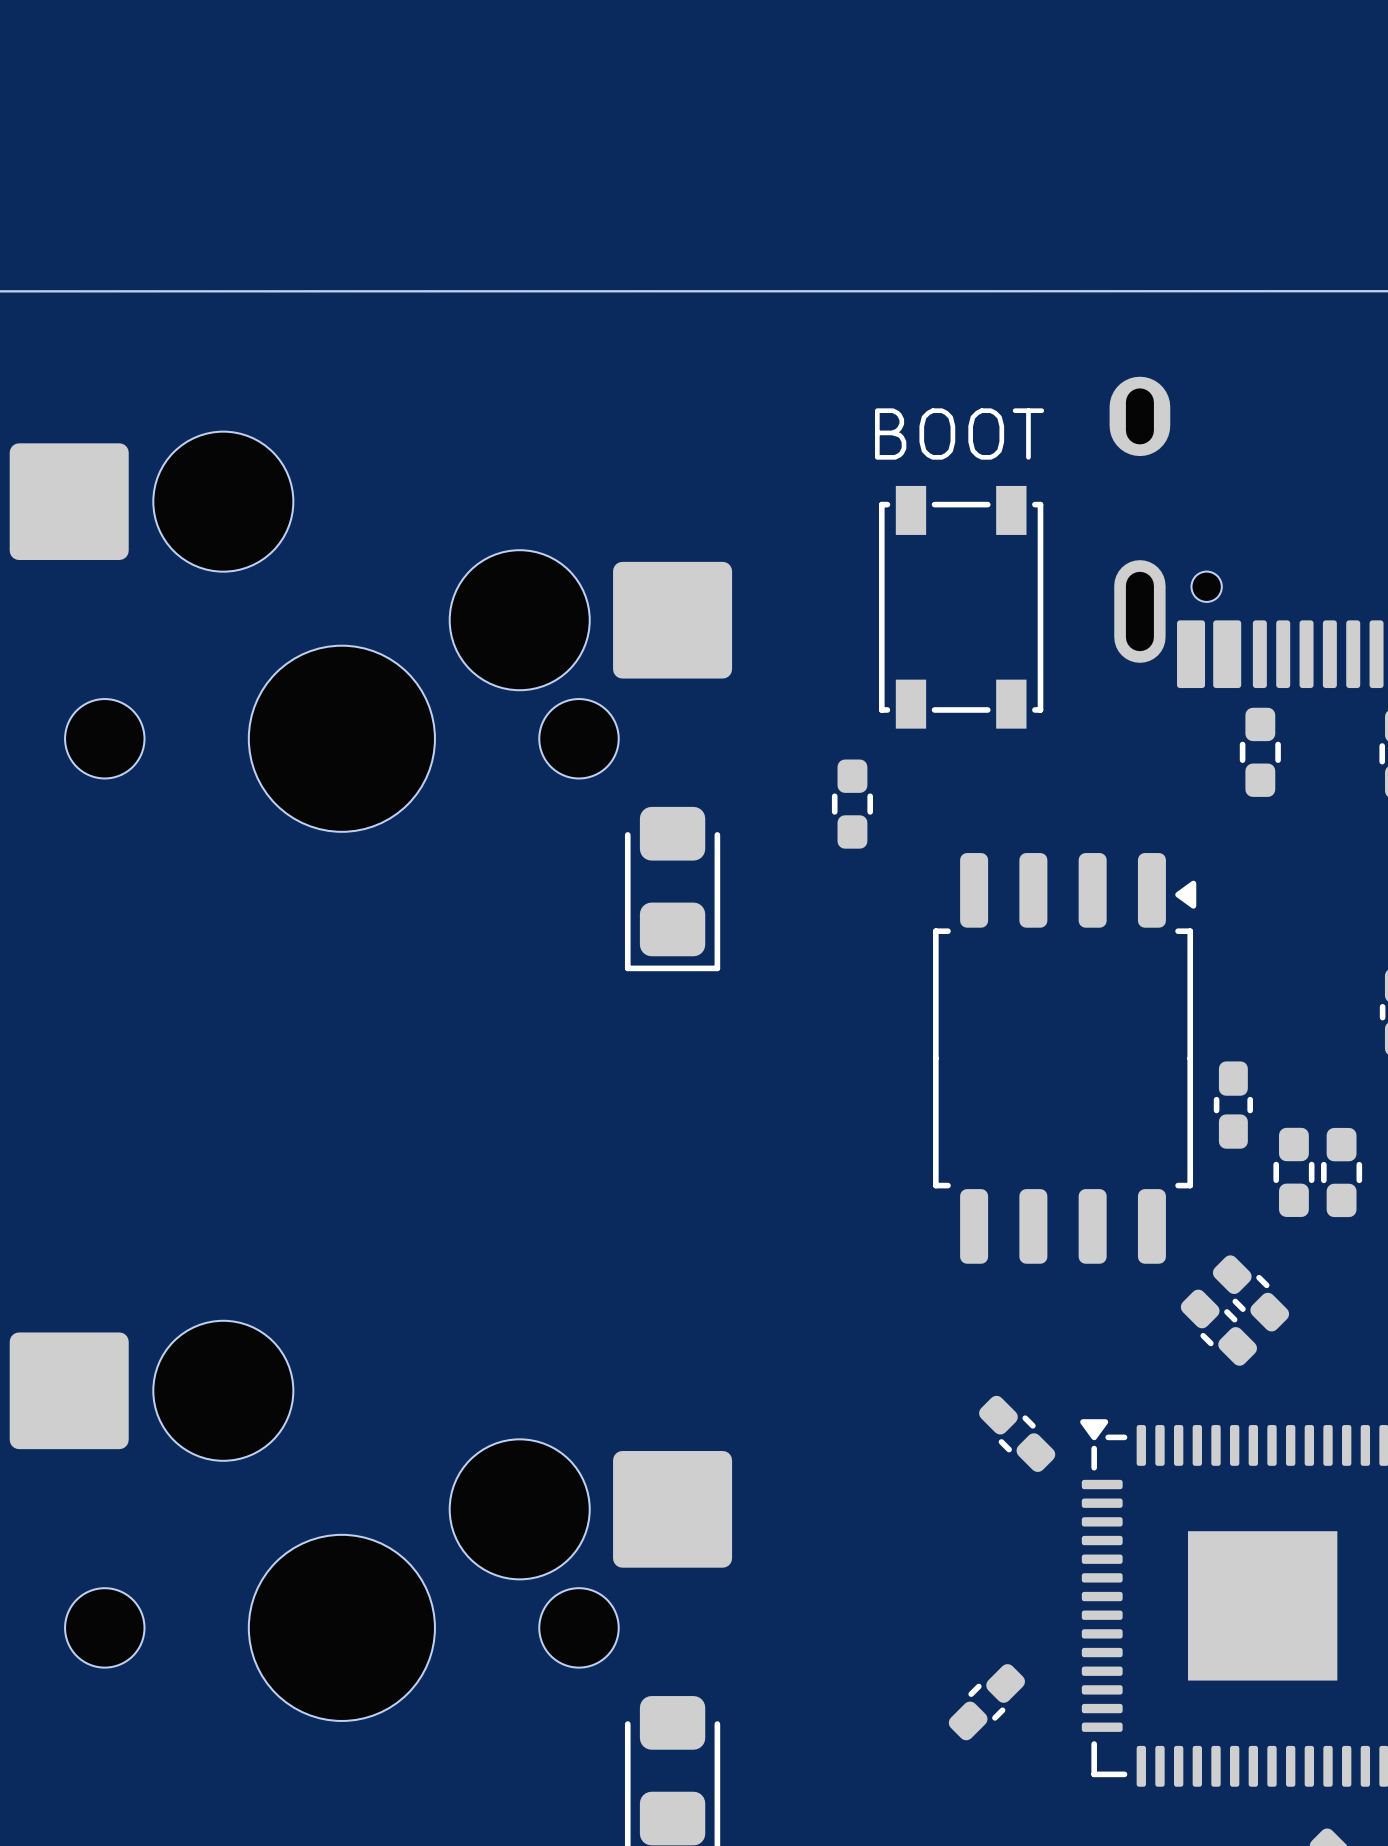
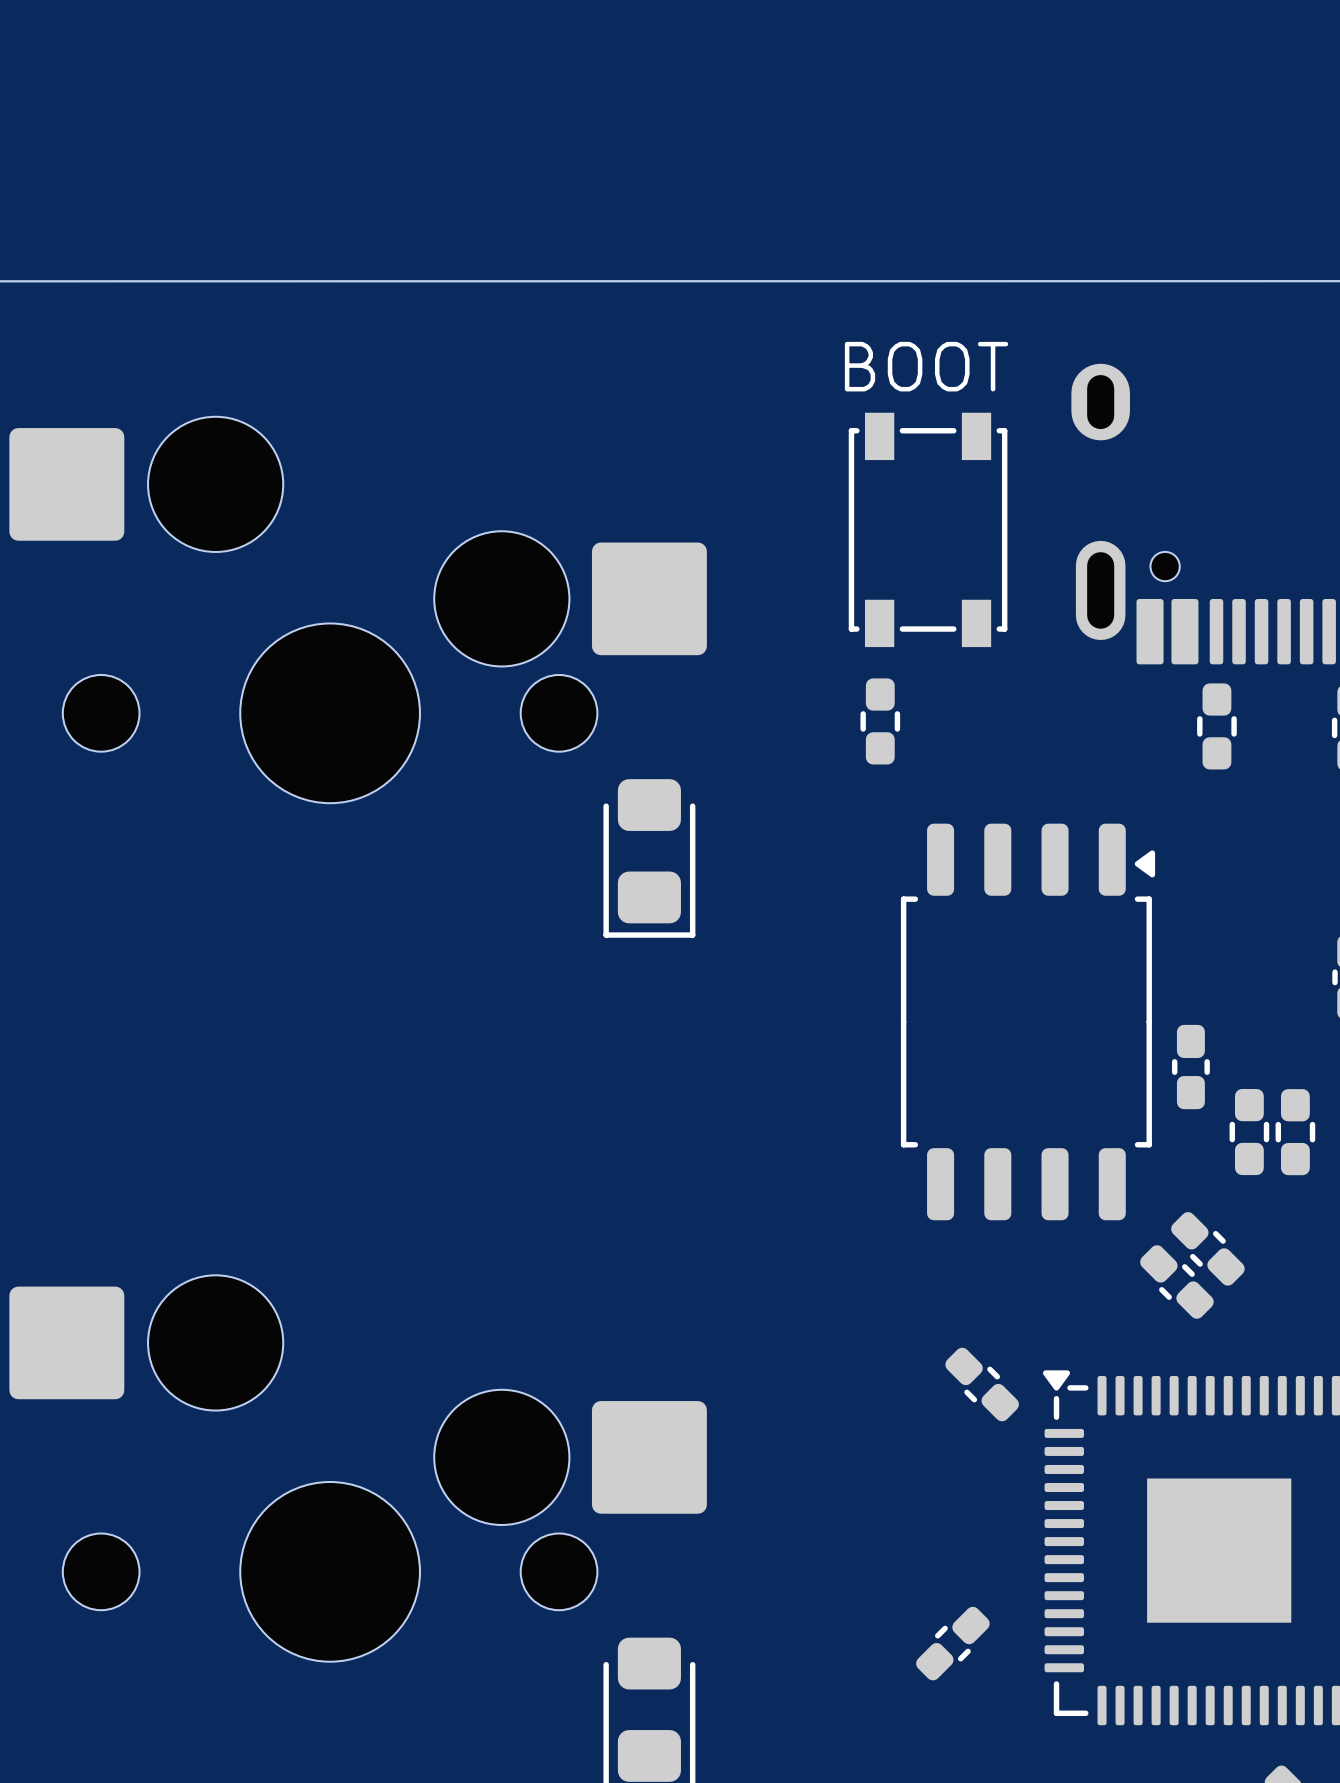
text position: BOOT (959, 434) -> BOOT (926, 366)
part position: (961, 607) -> (928, 529)
part position: (852, 804) -> (880, 721)

